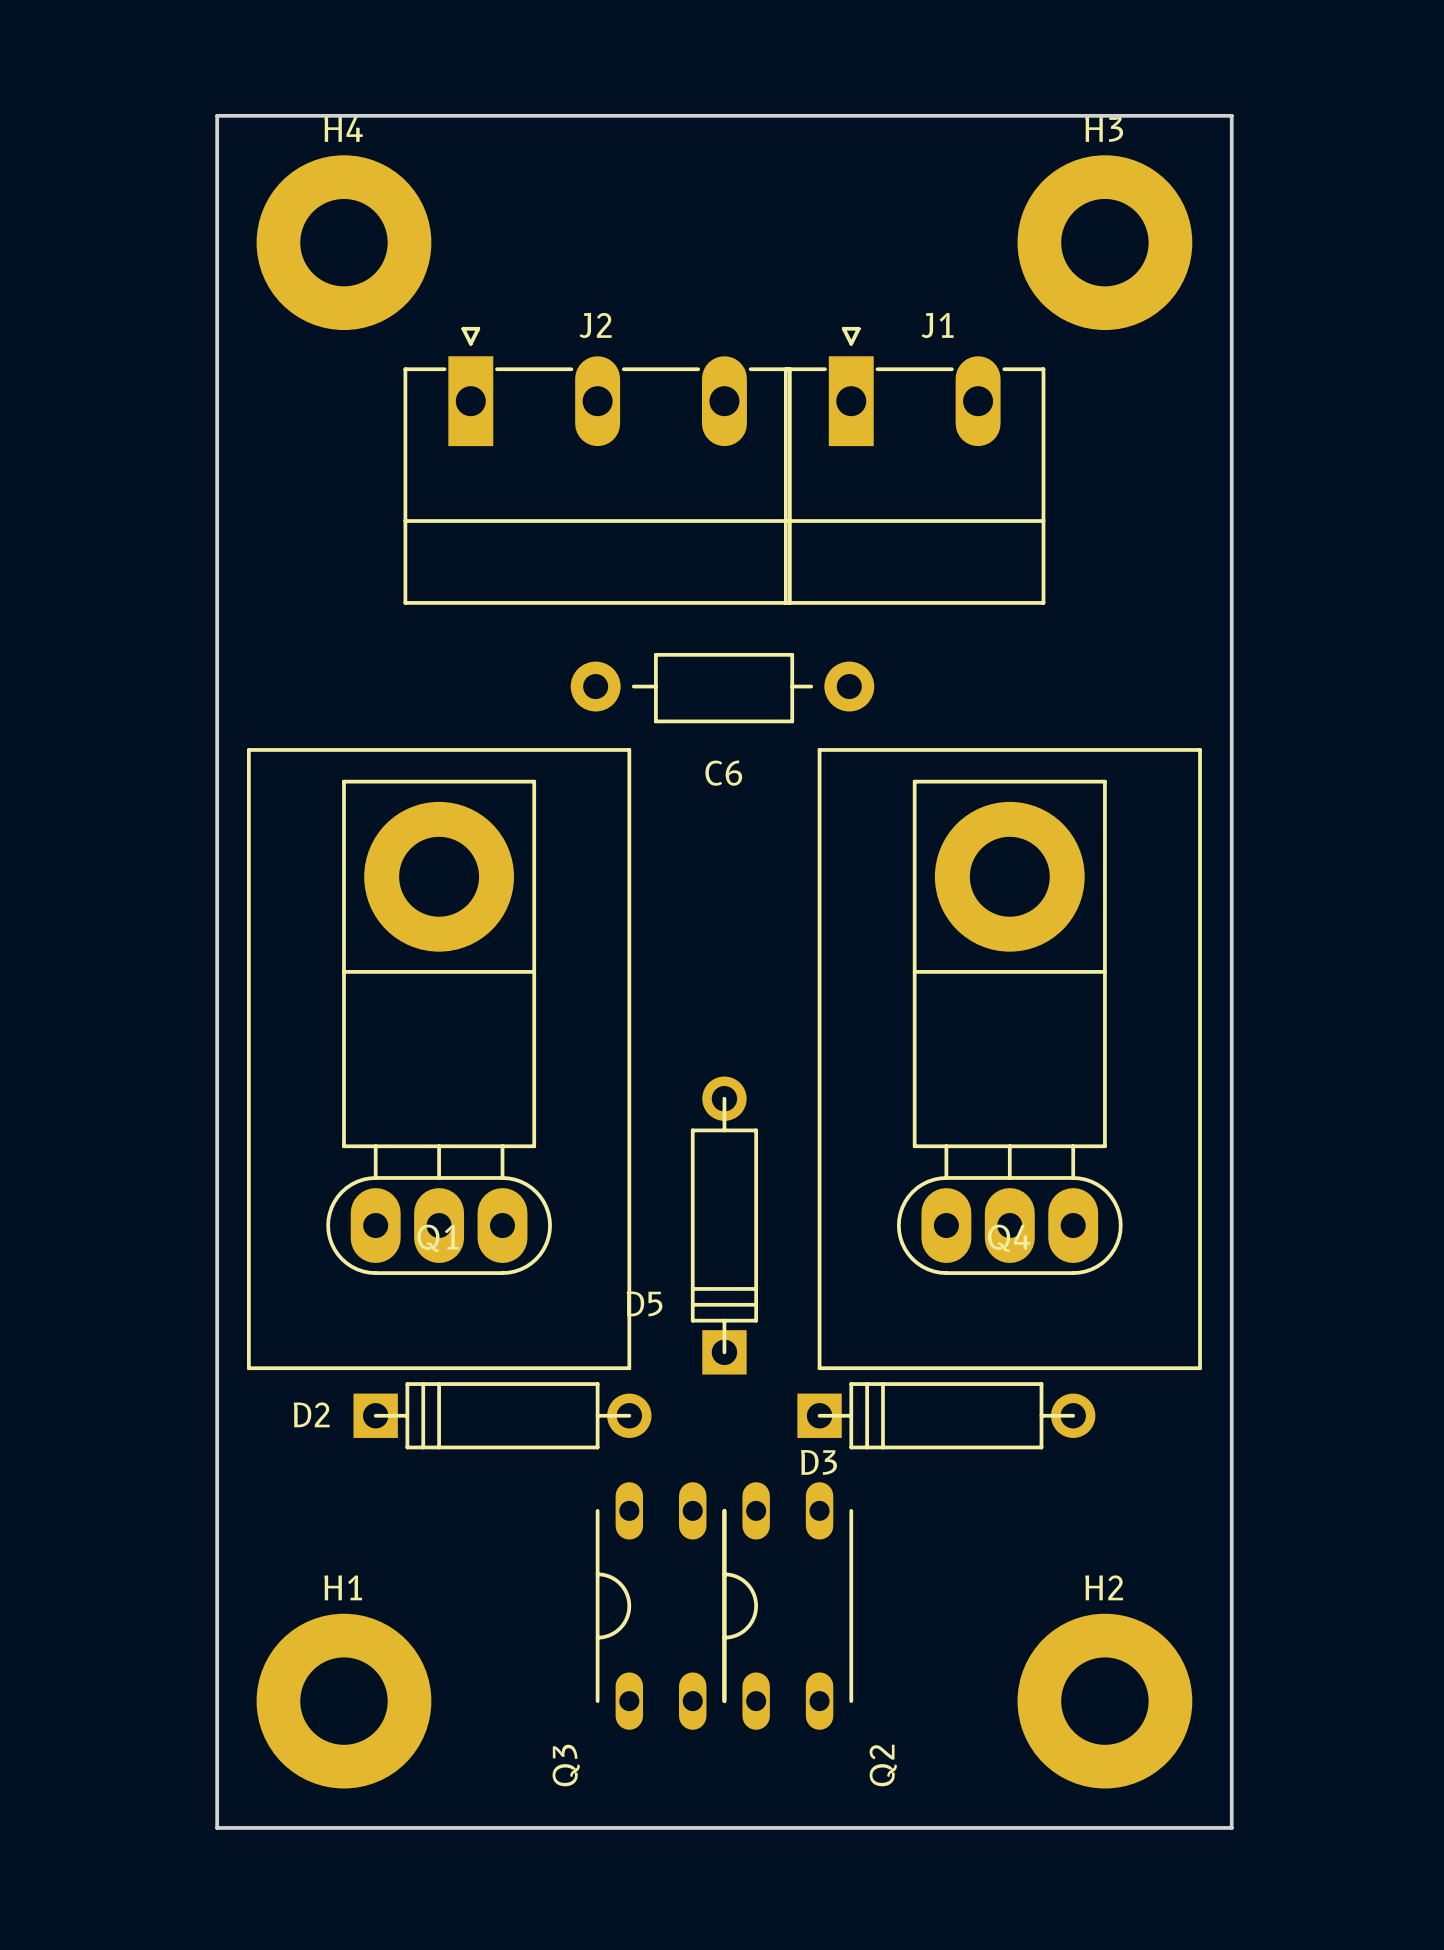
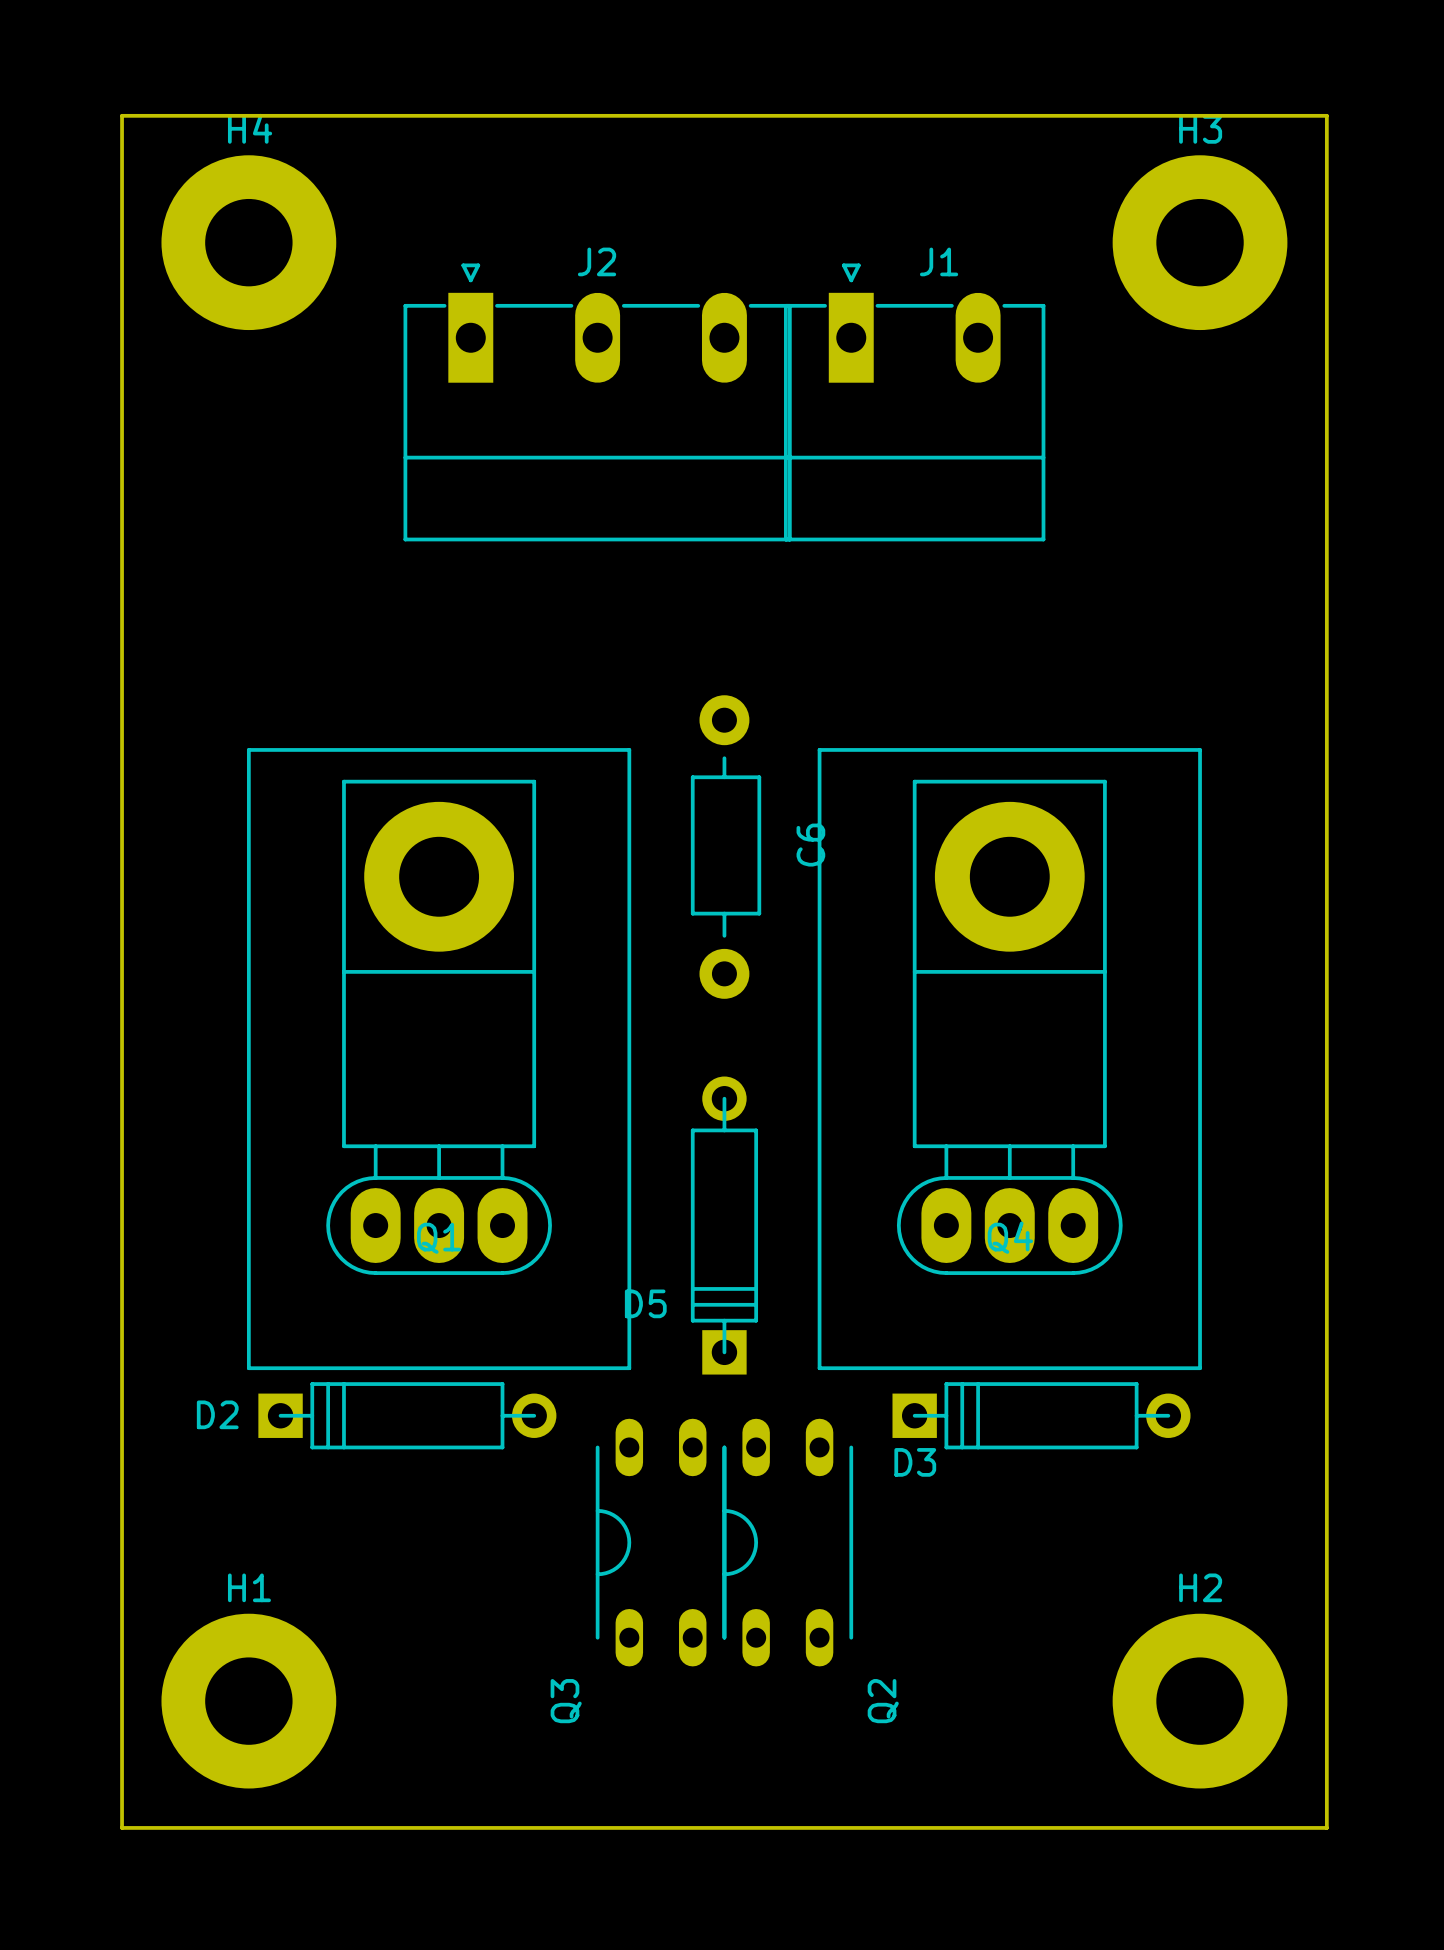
board edge: (217, 115) (217, 1827) -> (217, 115) (122, 115) (122, 1827) (217, 1827)
board edge: (1231, 115) (1231, 1827) -> (1231, 115) (1326, 115) (1326, 1827) (1231, 1827)
H4 position: (343, 242) -> (248, 242)
H3 position: (1104, 242) -> (1200, 242)
J2 position: (597, 465) -> (597, 402)
J1 position: (914, 465) -> (914, 402)
C6 rotation: 0° (722, 688) -> 90° counterclockwise (726, 847)
D2 position: (502, 1415) -> (407, 1415)
D3 position: (946, 1415) -> (1041, 1415)
Q3 position: (661, 1606) -> (661, 1542)
Q2 position: (787, 1606) -> (787, 1542)
H1 position: (343, 1701) -> (248, 1701)
H2 position: (1104, 1701) -> (1200, 1701)

